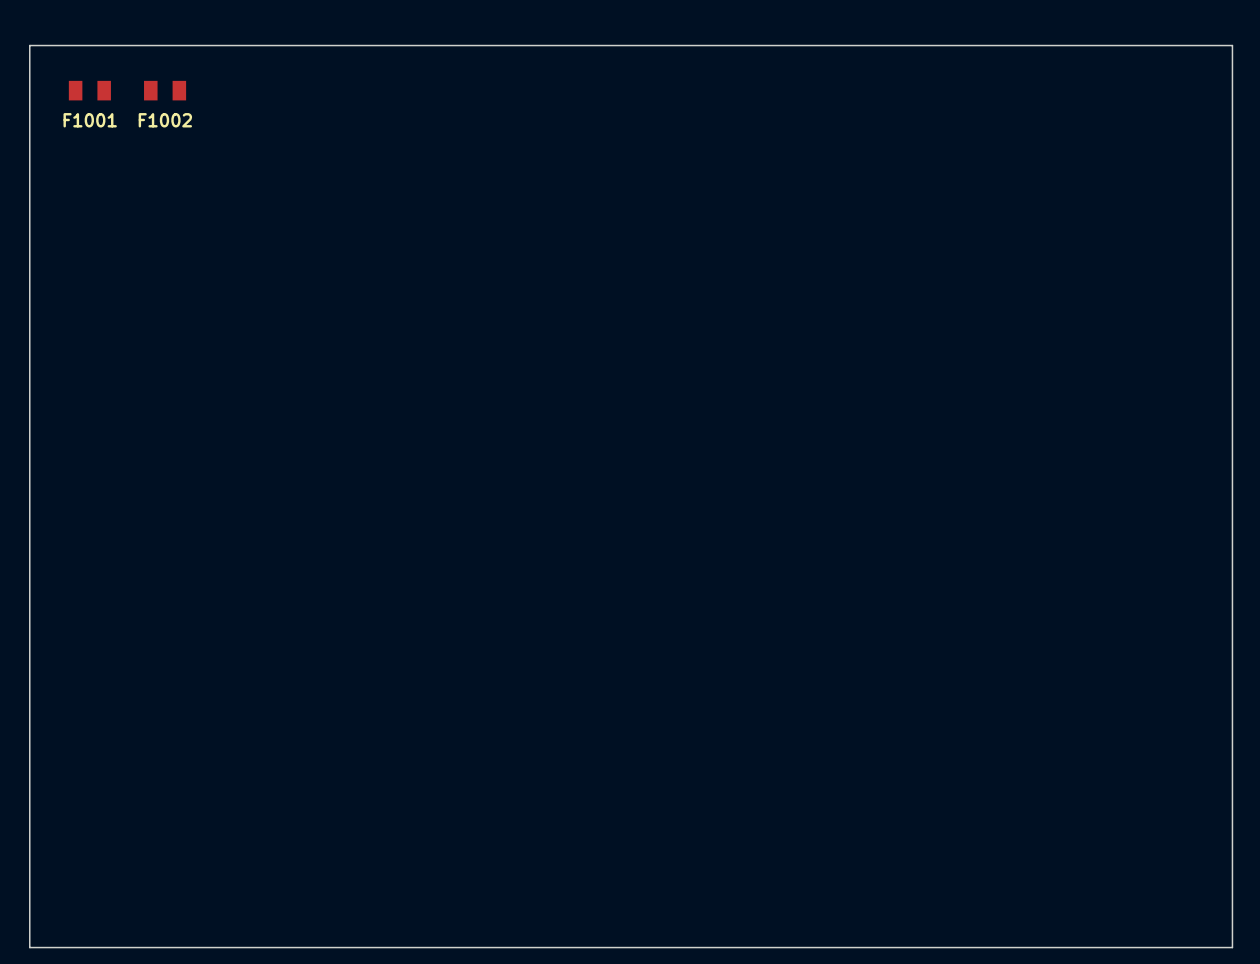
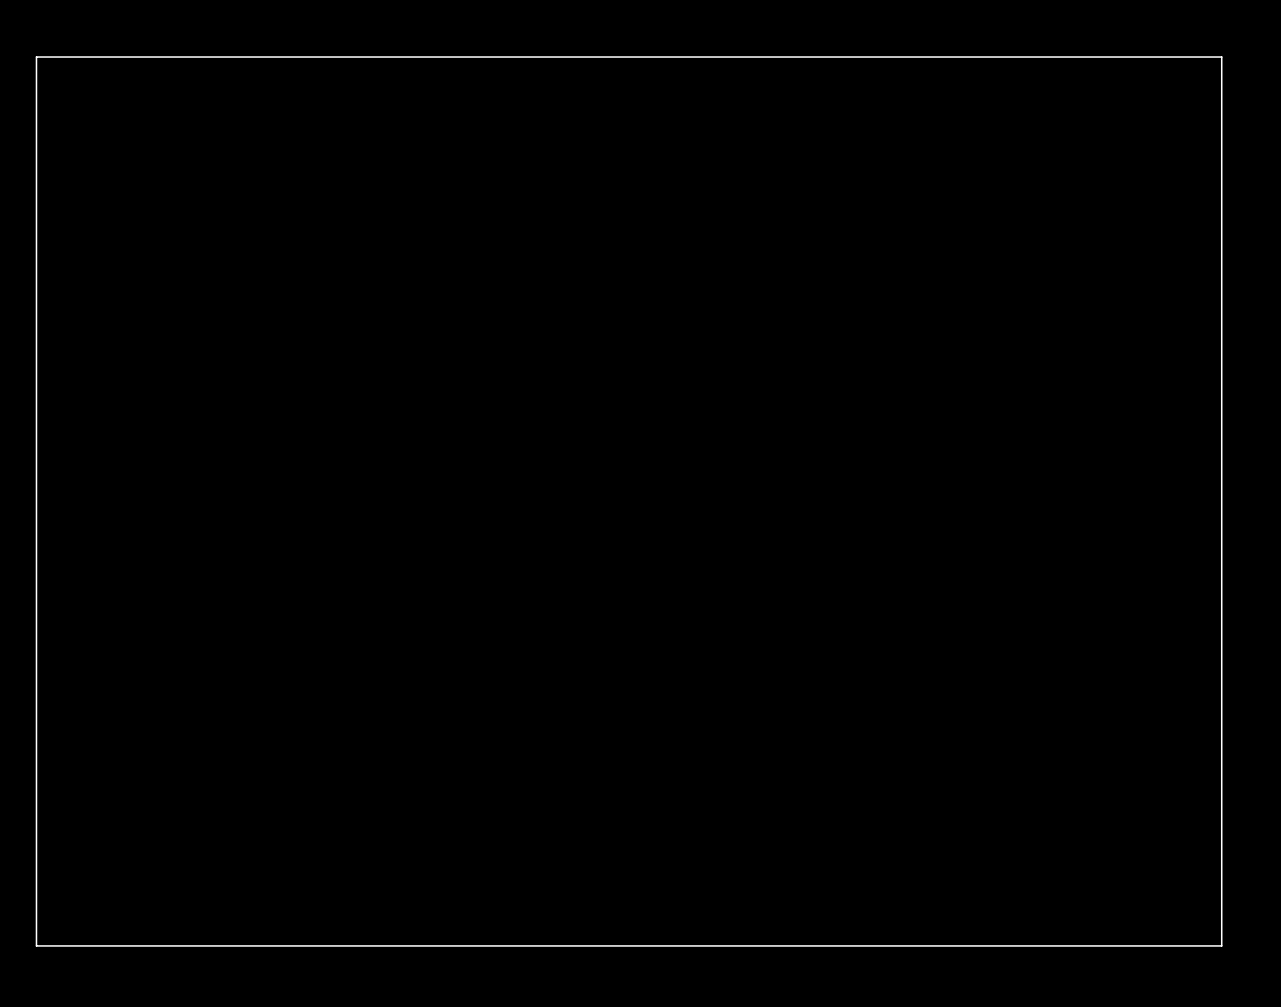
F1001: (89, 90) -> none
F1002: (165, 90) -> none

